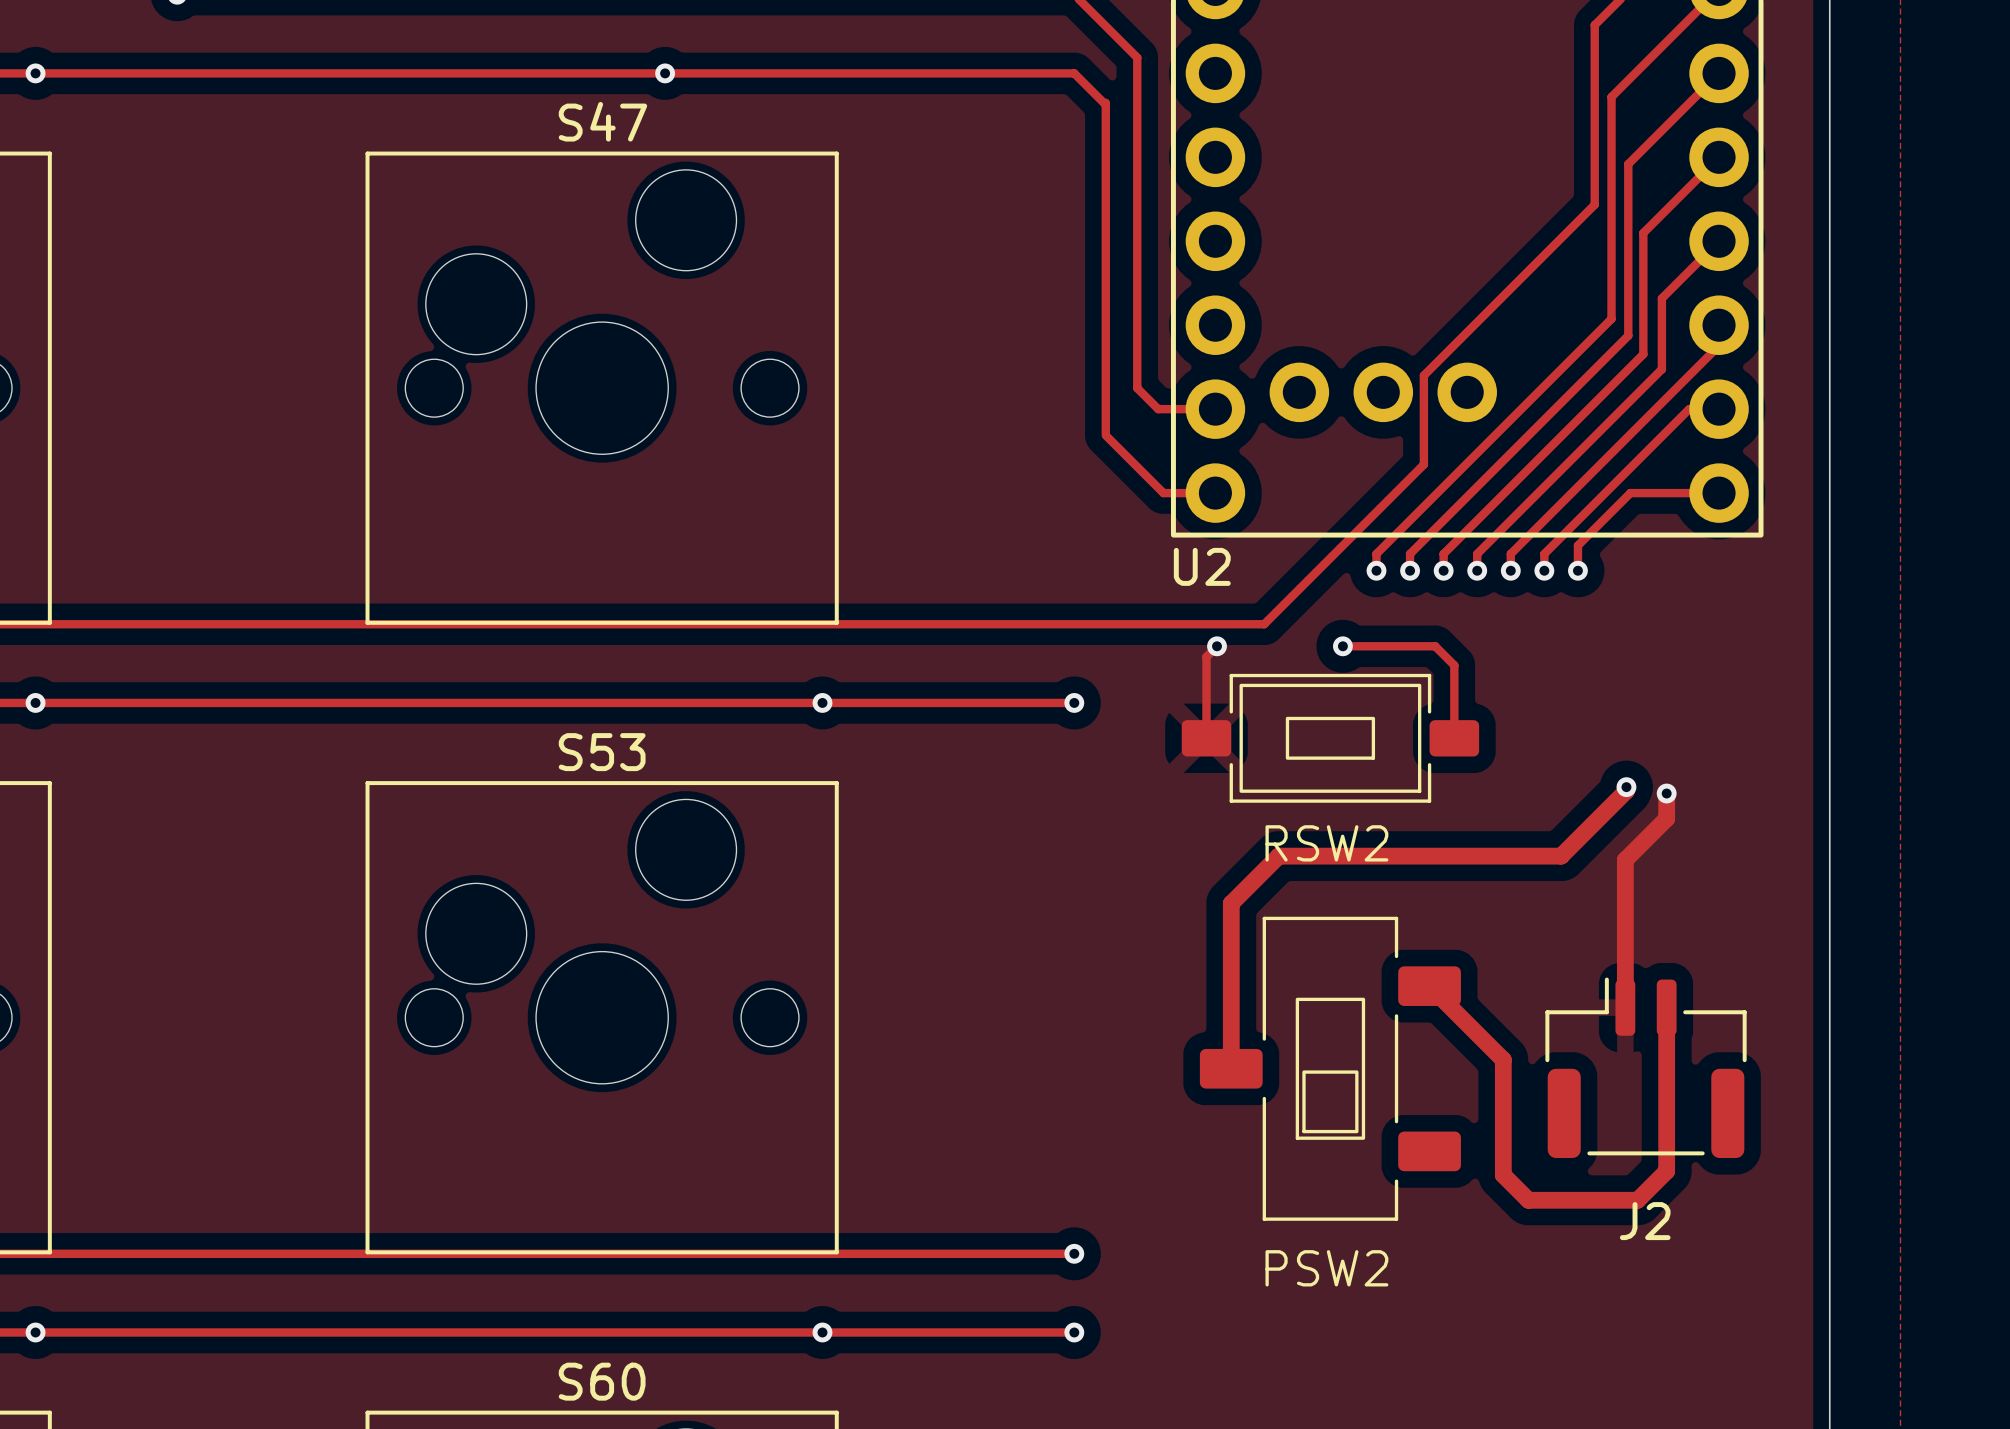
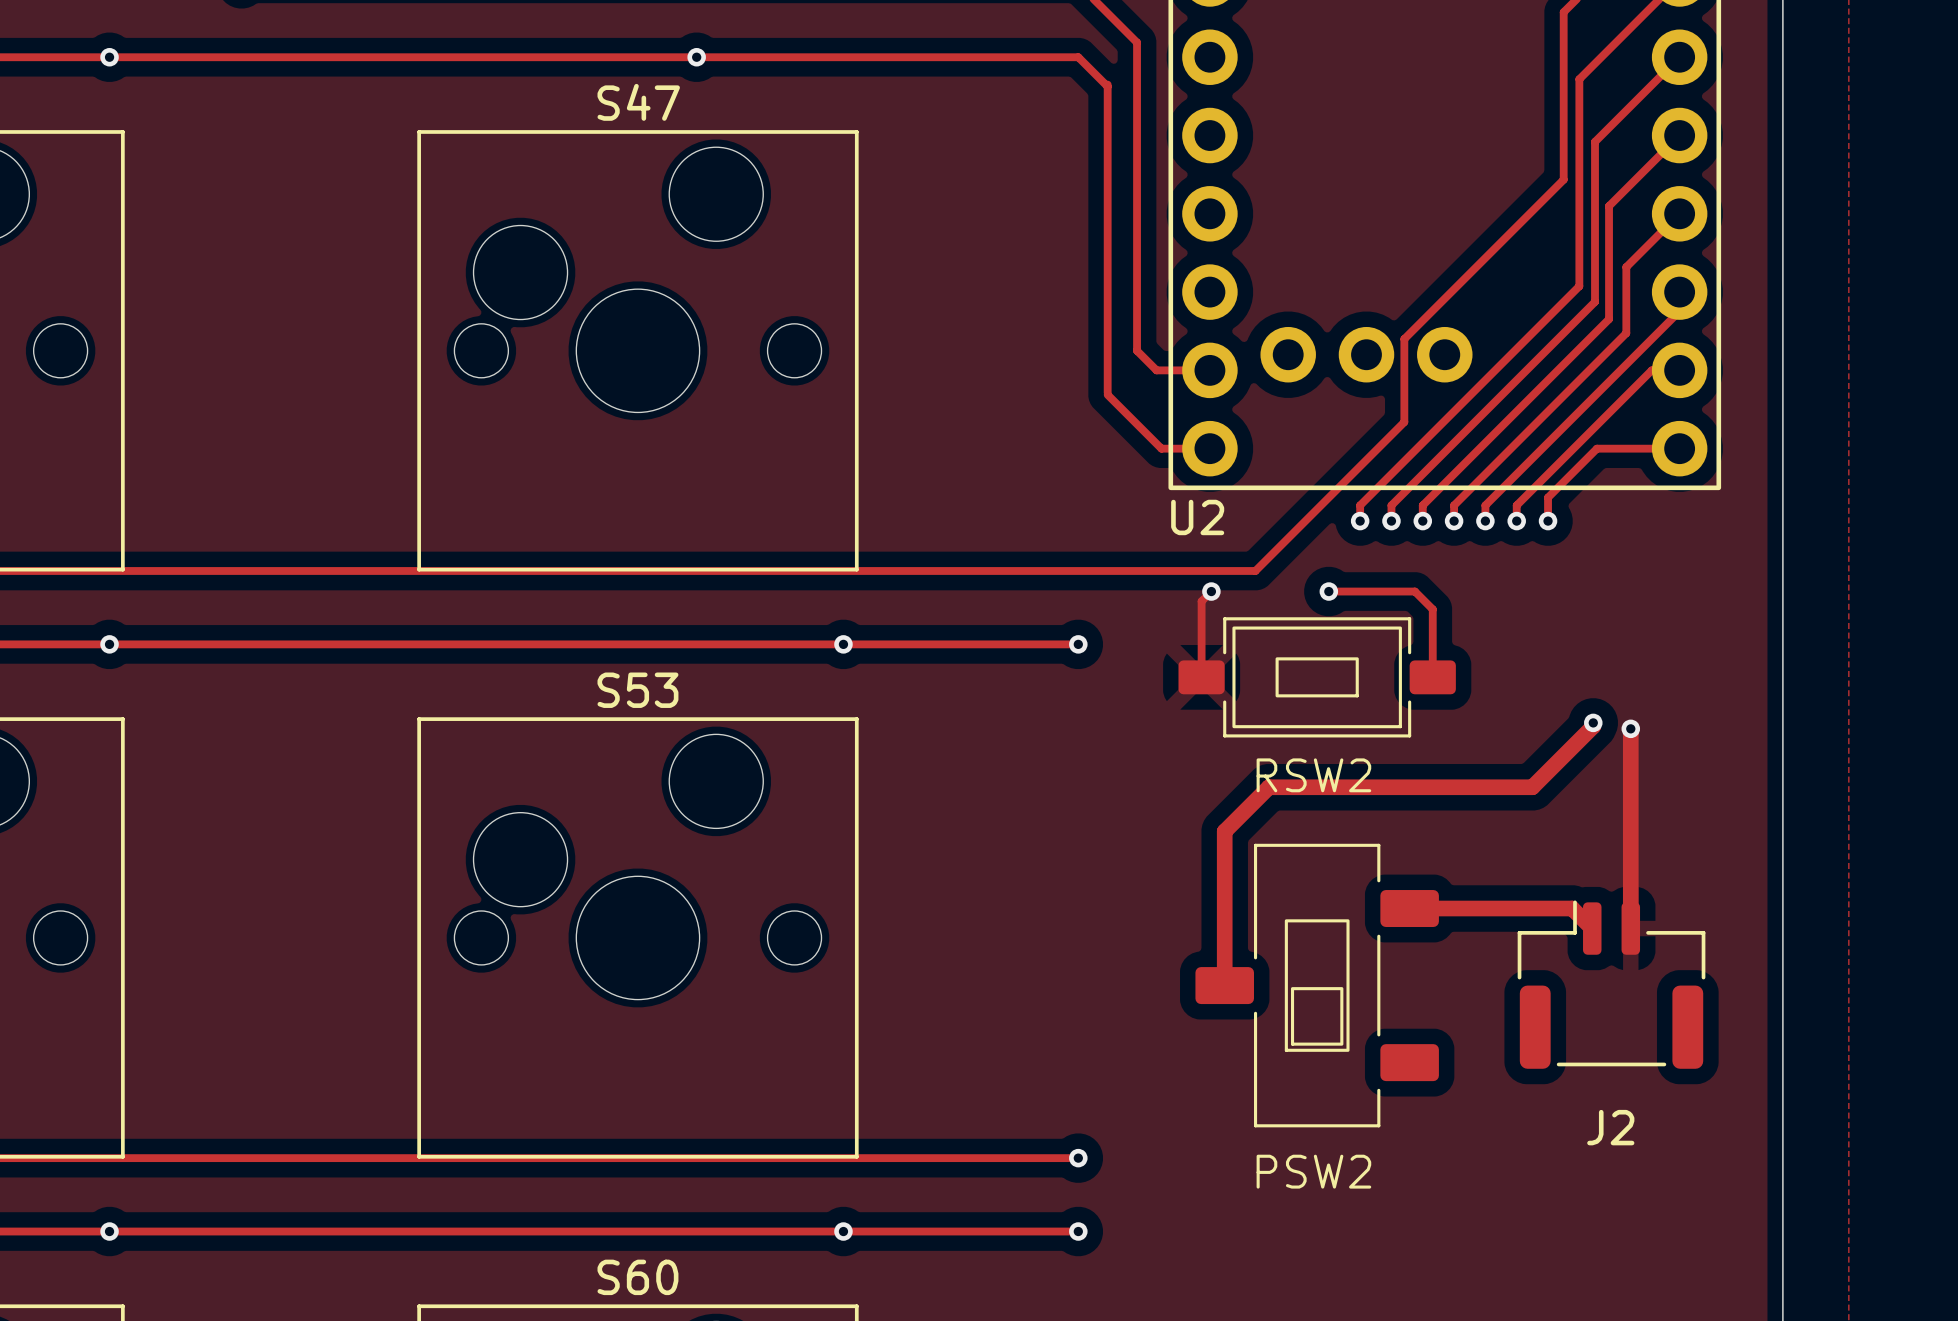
track: (1666, 818) (1625, 860) (1625, 1007) -> (1630, 752) (1630, 928)
track: (1429, 986) (1503, 1059) (1503, 1175) (1528, 1200) (1637, 1200) (1666, 1171) (1666, 1007) -> (1409, 908) (1572, 908) (1592, 928)

